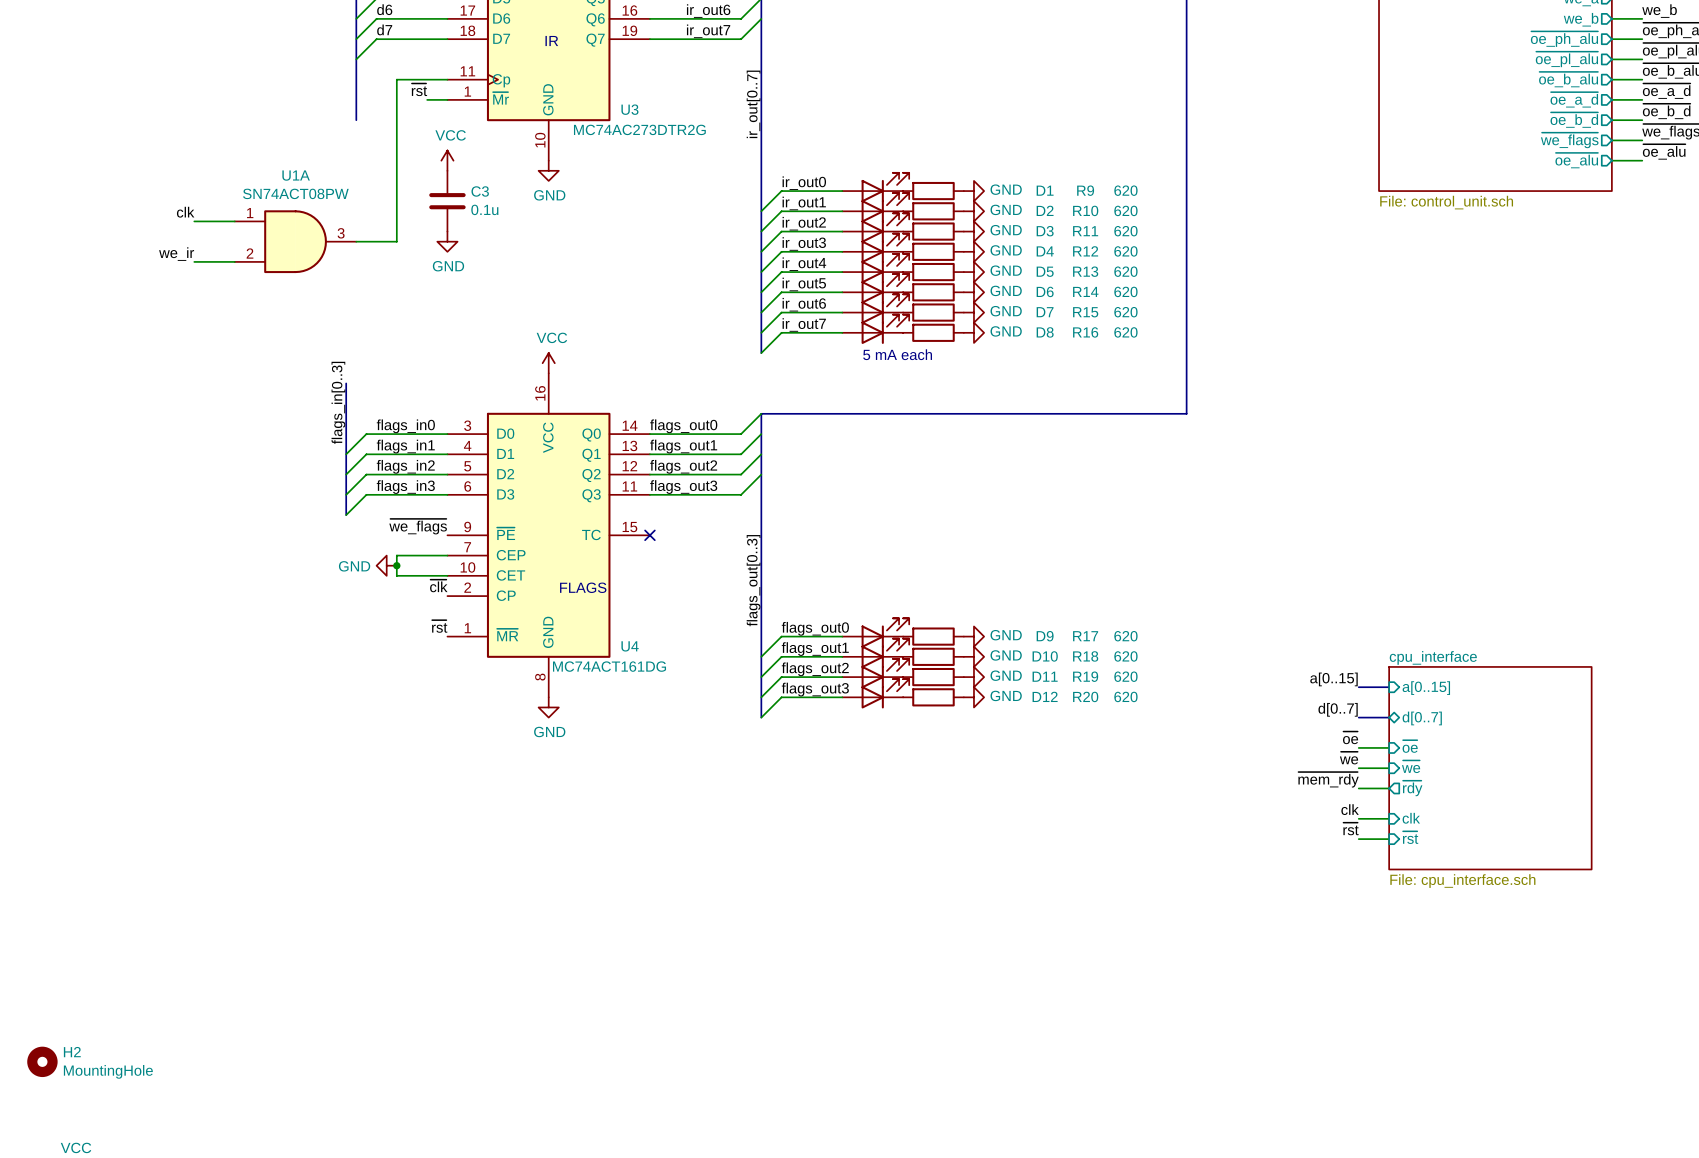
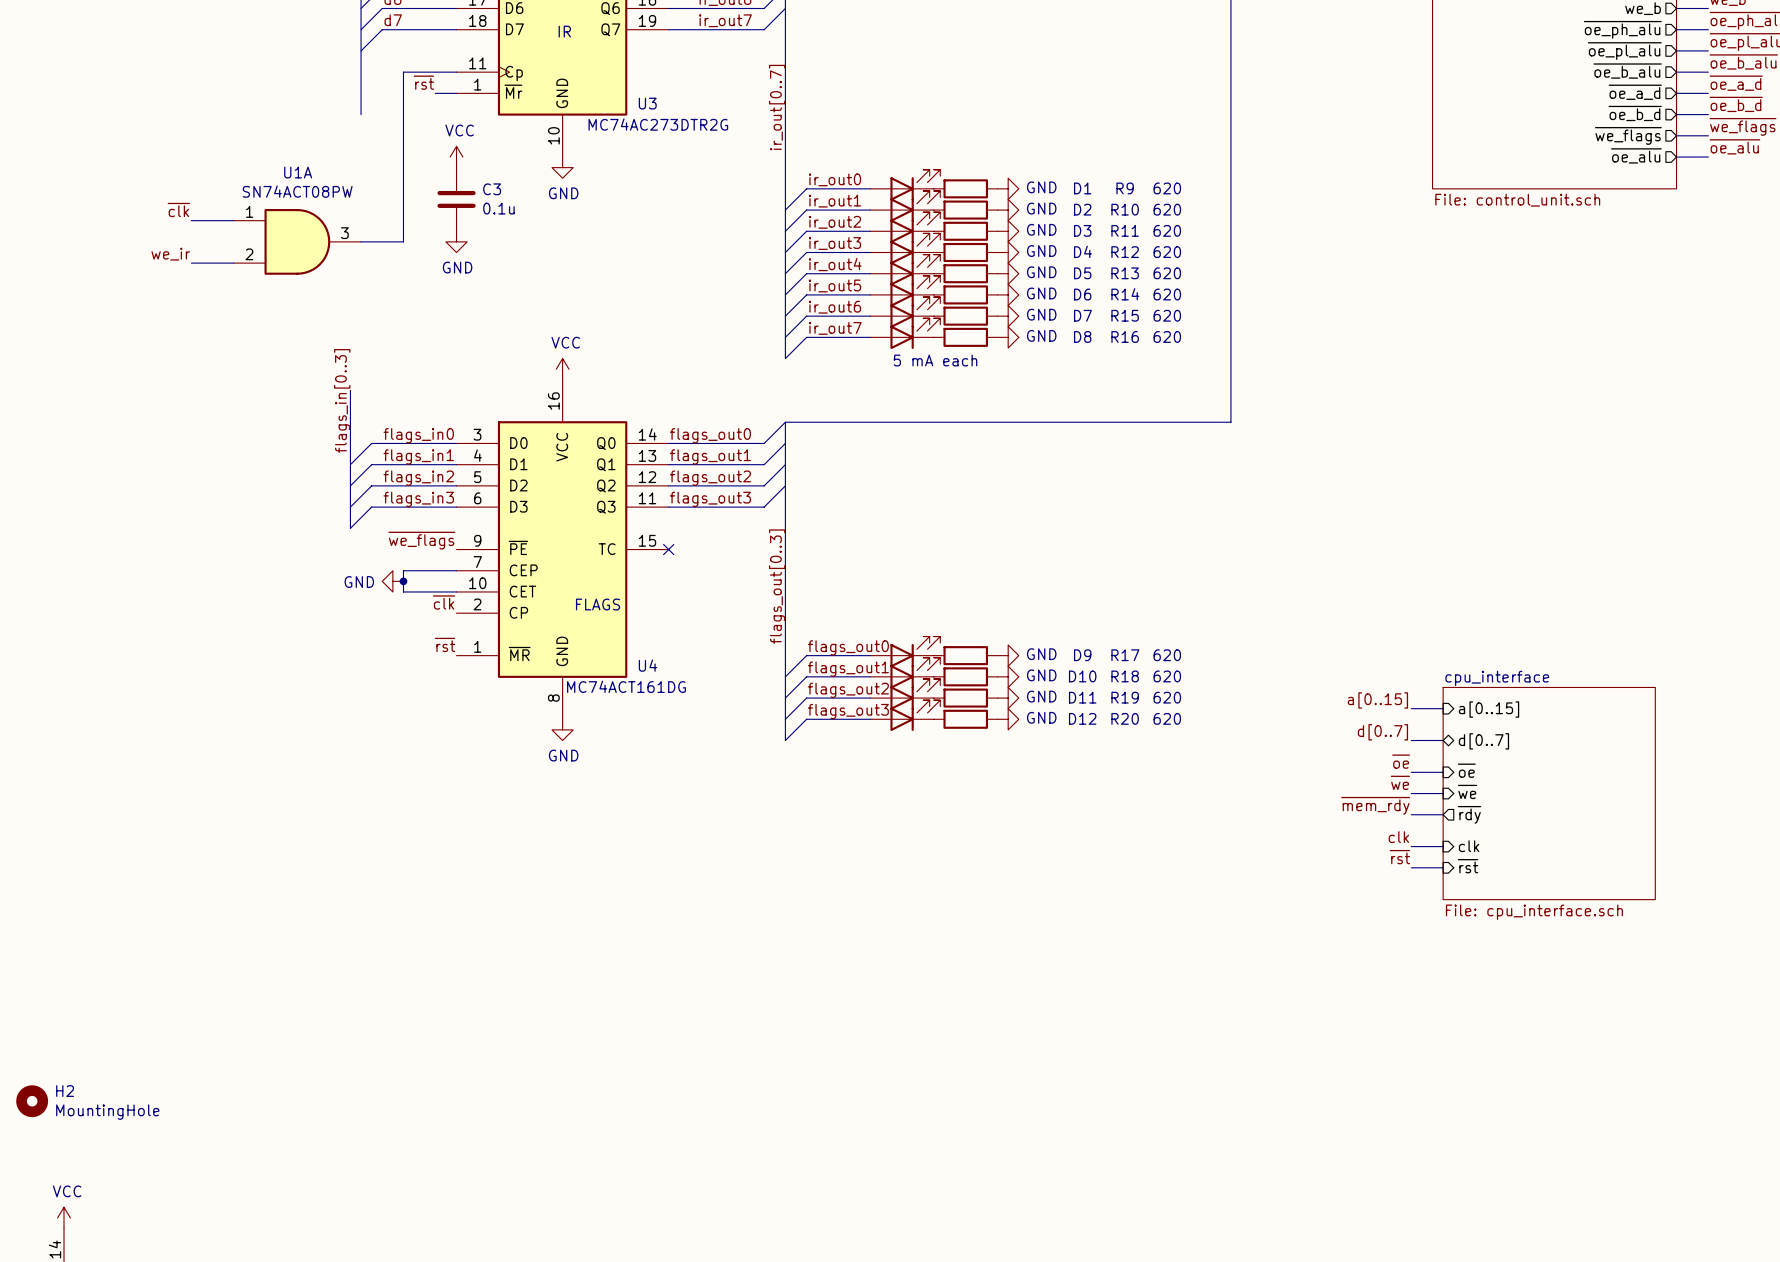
label: clk (185, 212) -> ~{clk} (178, 209)

